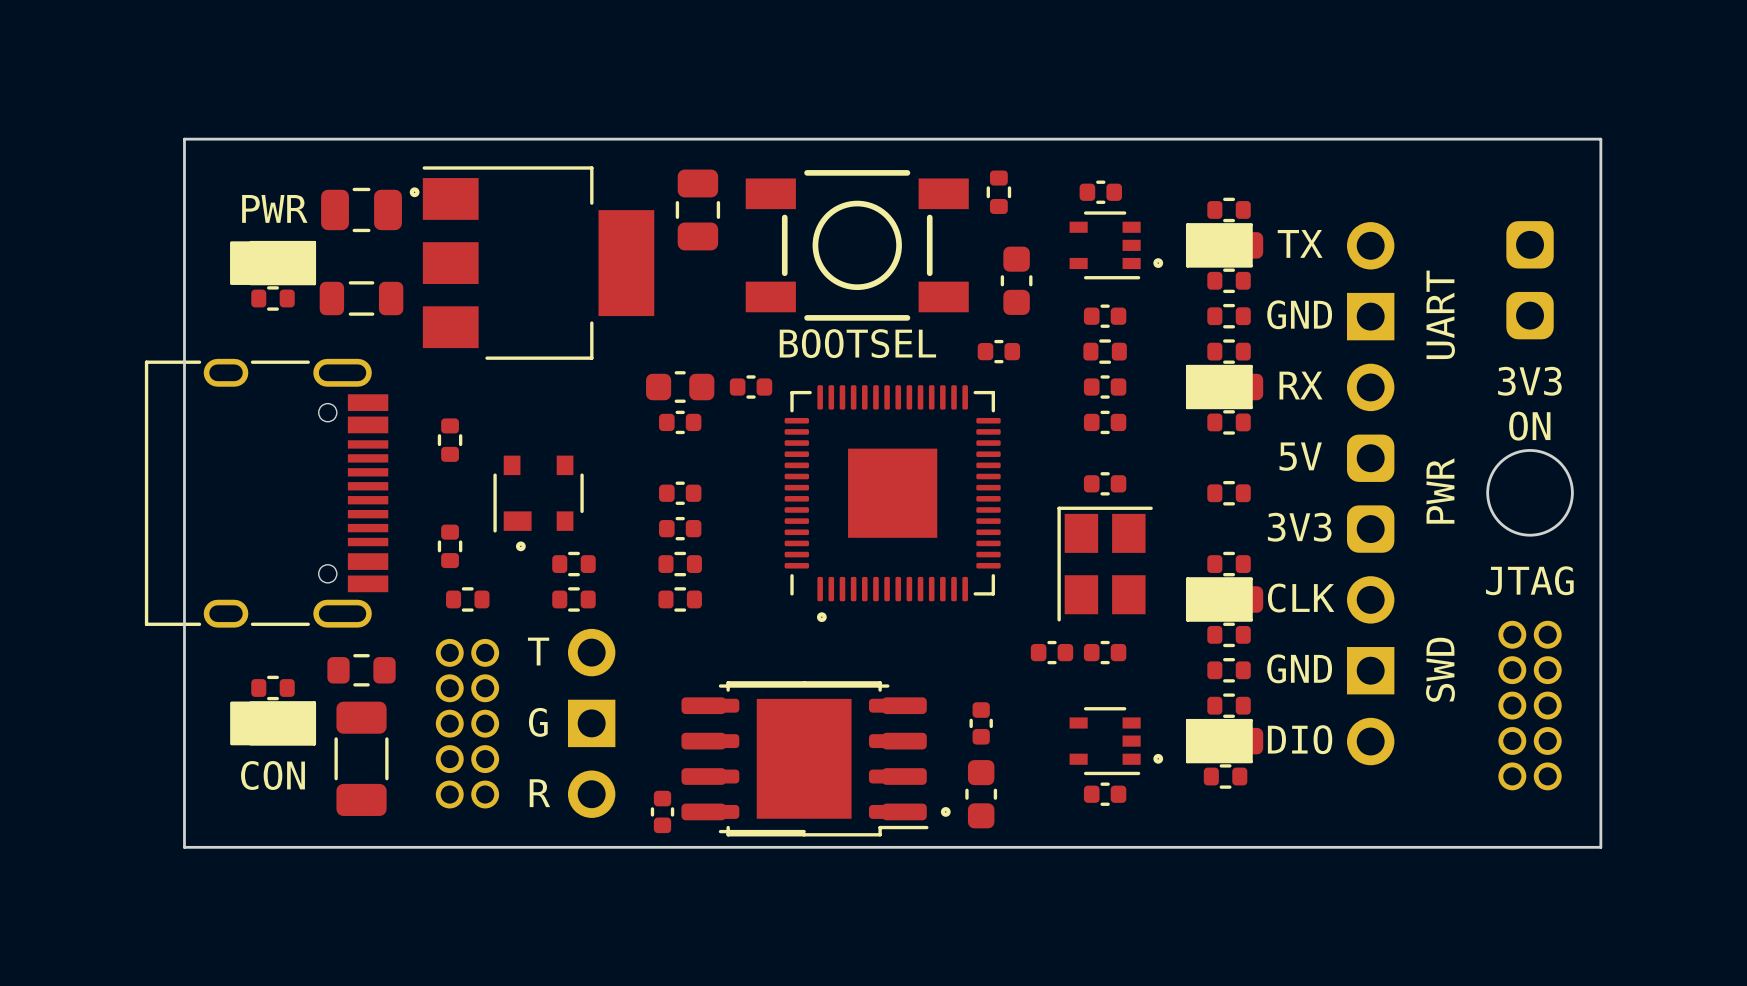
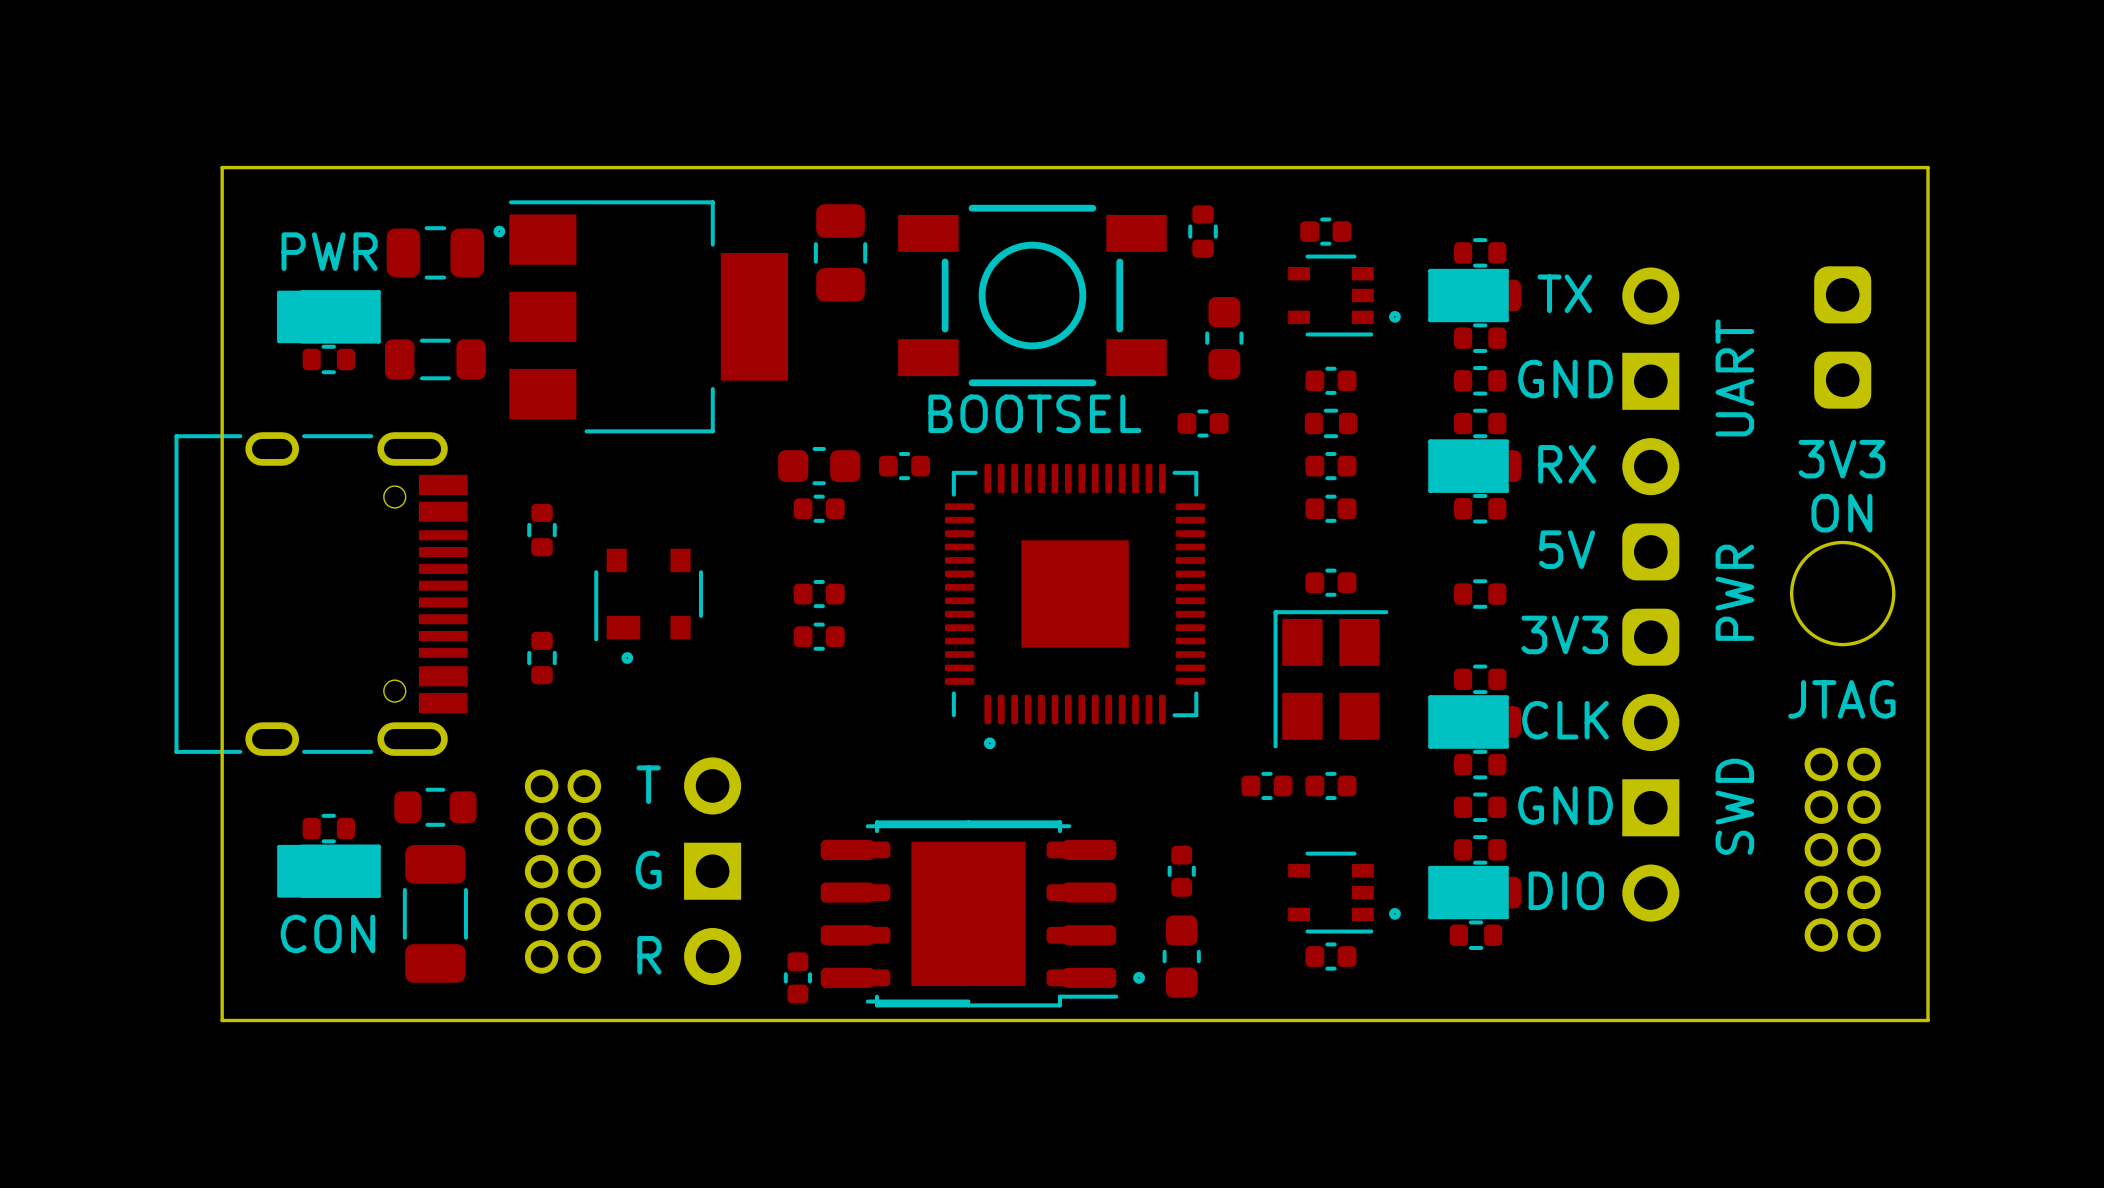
part: (573, 564) -> none
part: (680, 564) -> none
part: (467, 599) -> none
part: (573, 599) -> none
part: (680, 599) -> none

